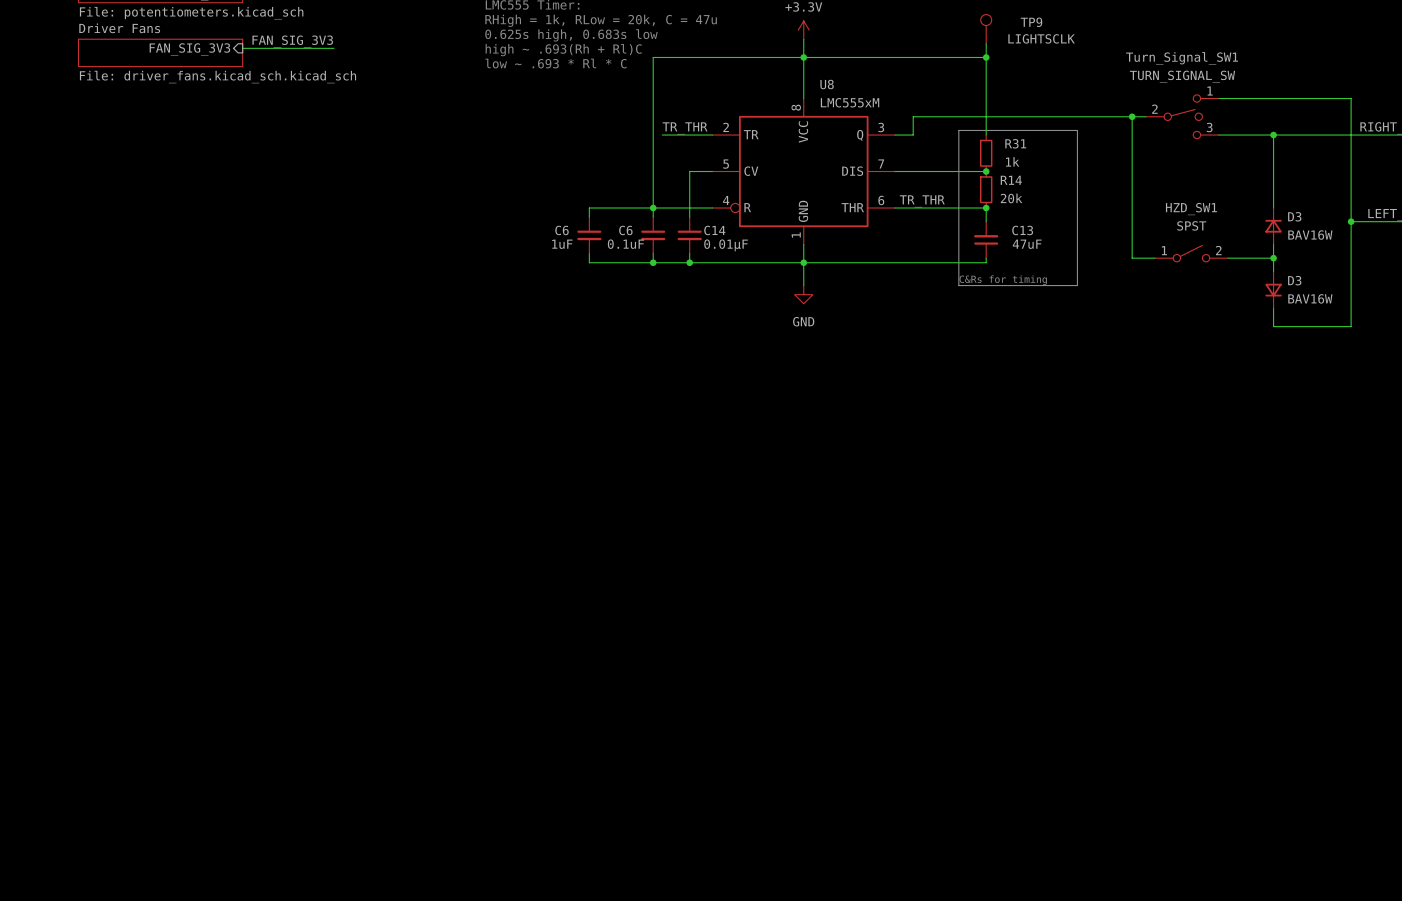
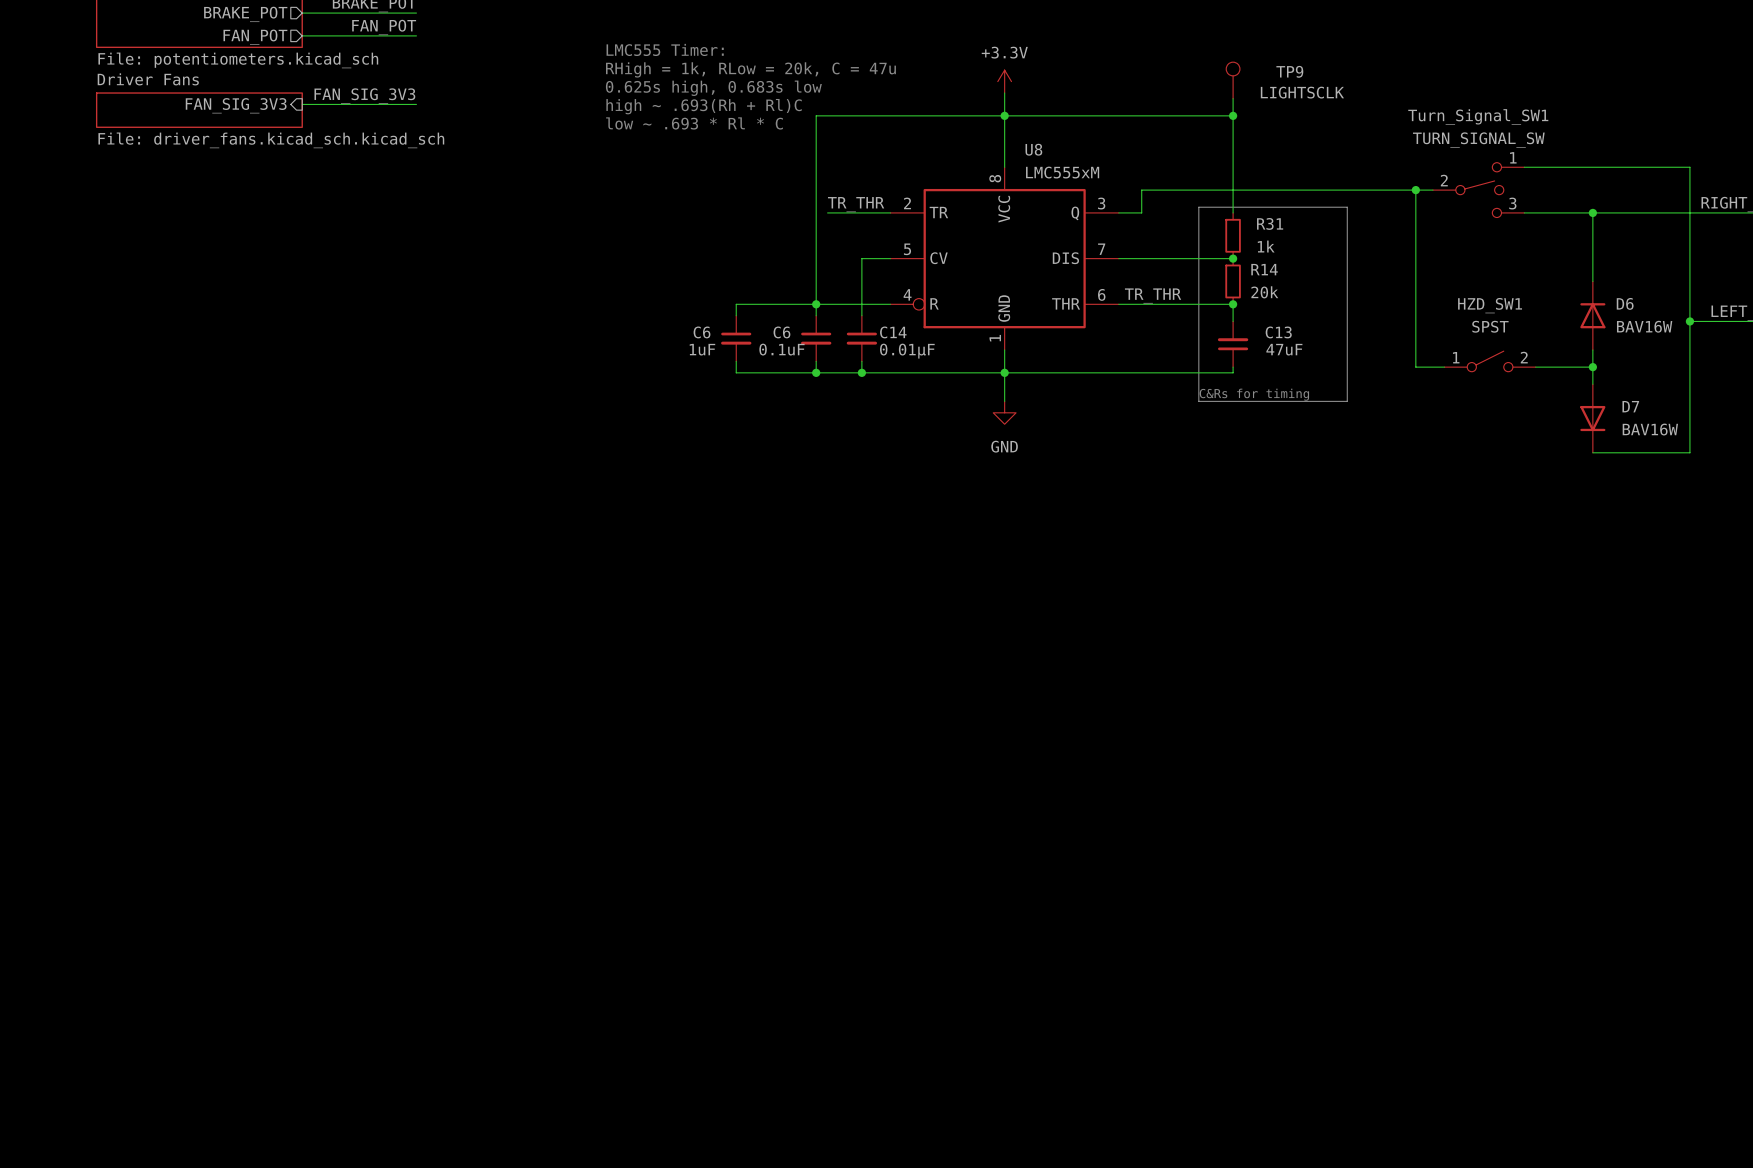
D6: none -> BAV16W (1592, 315)
D3: BAV16W (1273, 226) -> none
D3: BAV16W (1273, 290) -> none
D7: none -> BAV16W (1592, 418)

